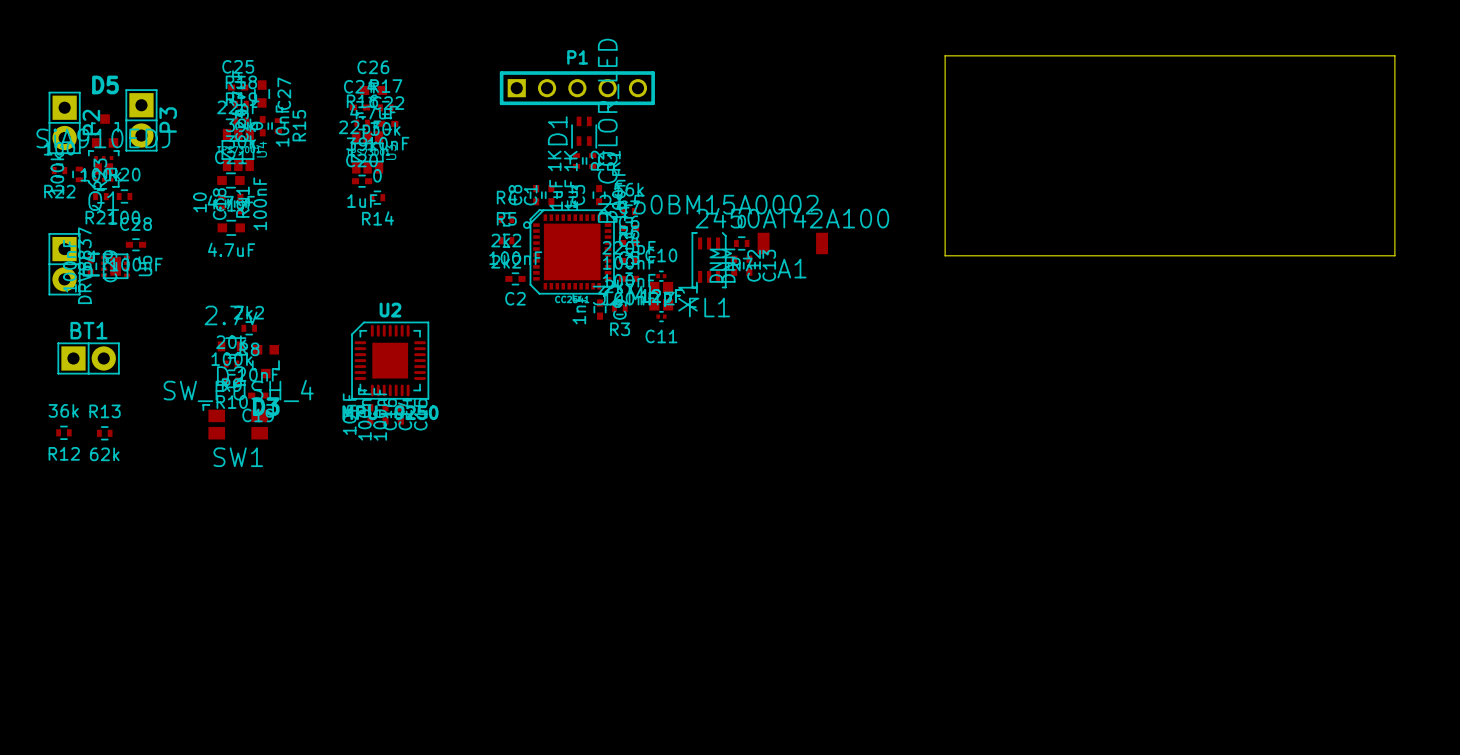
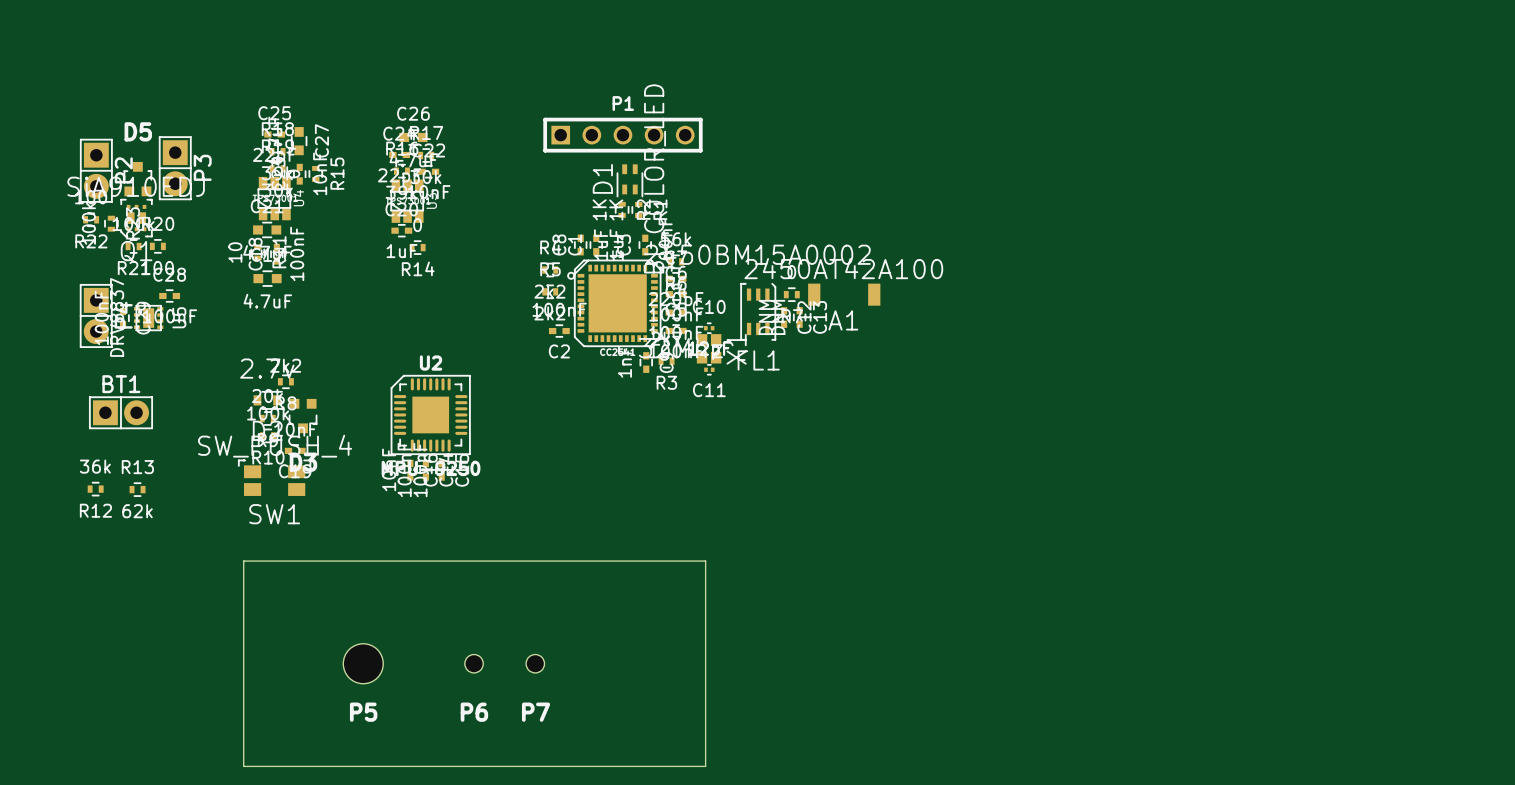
board edge: (945, 55) (1394, 55) (1394, 255) (945, 255) (945, 55) -> none
board edge: none -> (243, 561) (705, 561) (705, 766) (243, 766) (243, 561)
P5: none -> (363, 663)
P6: none -> (474, 663)
P7: none -> (535, 663)

